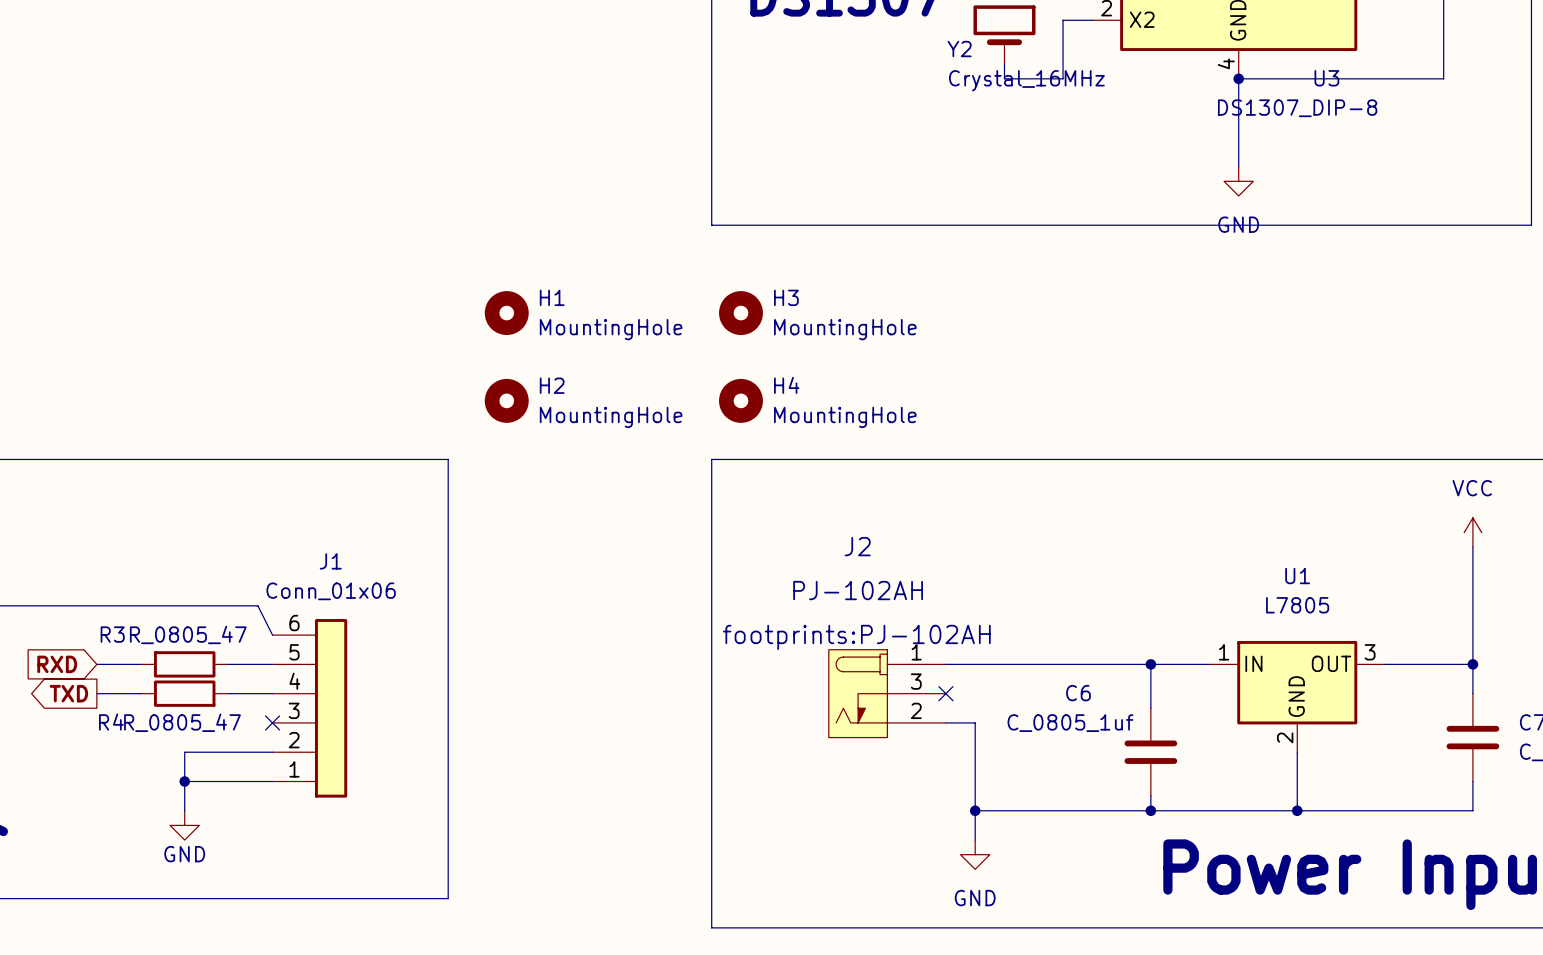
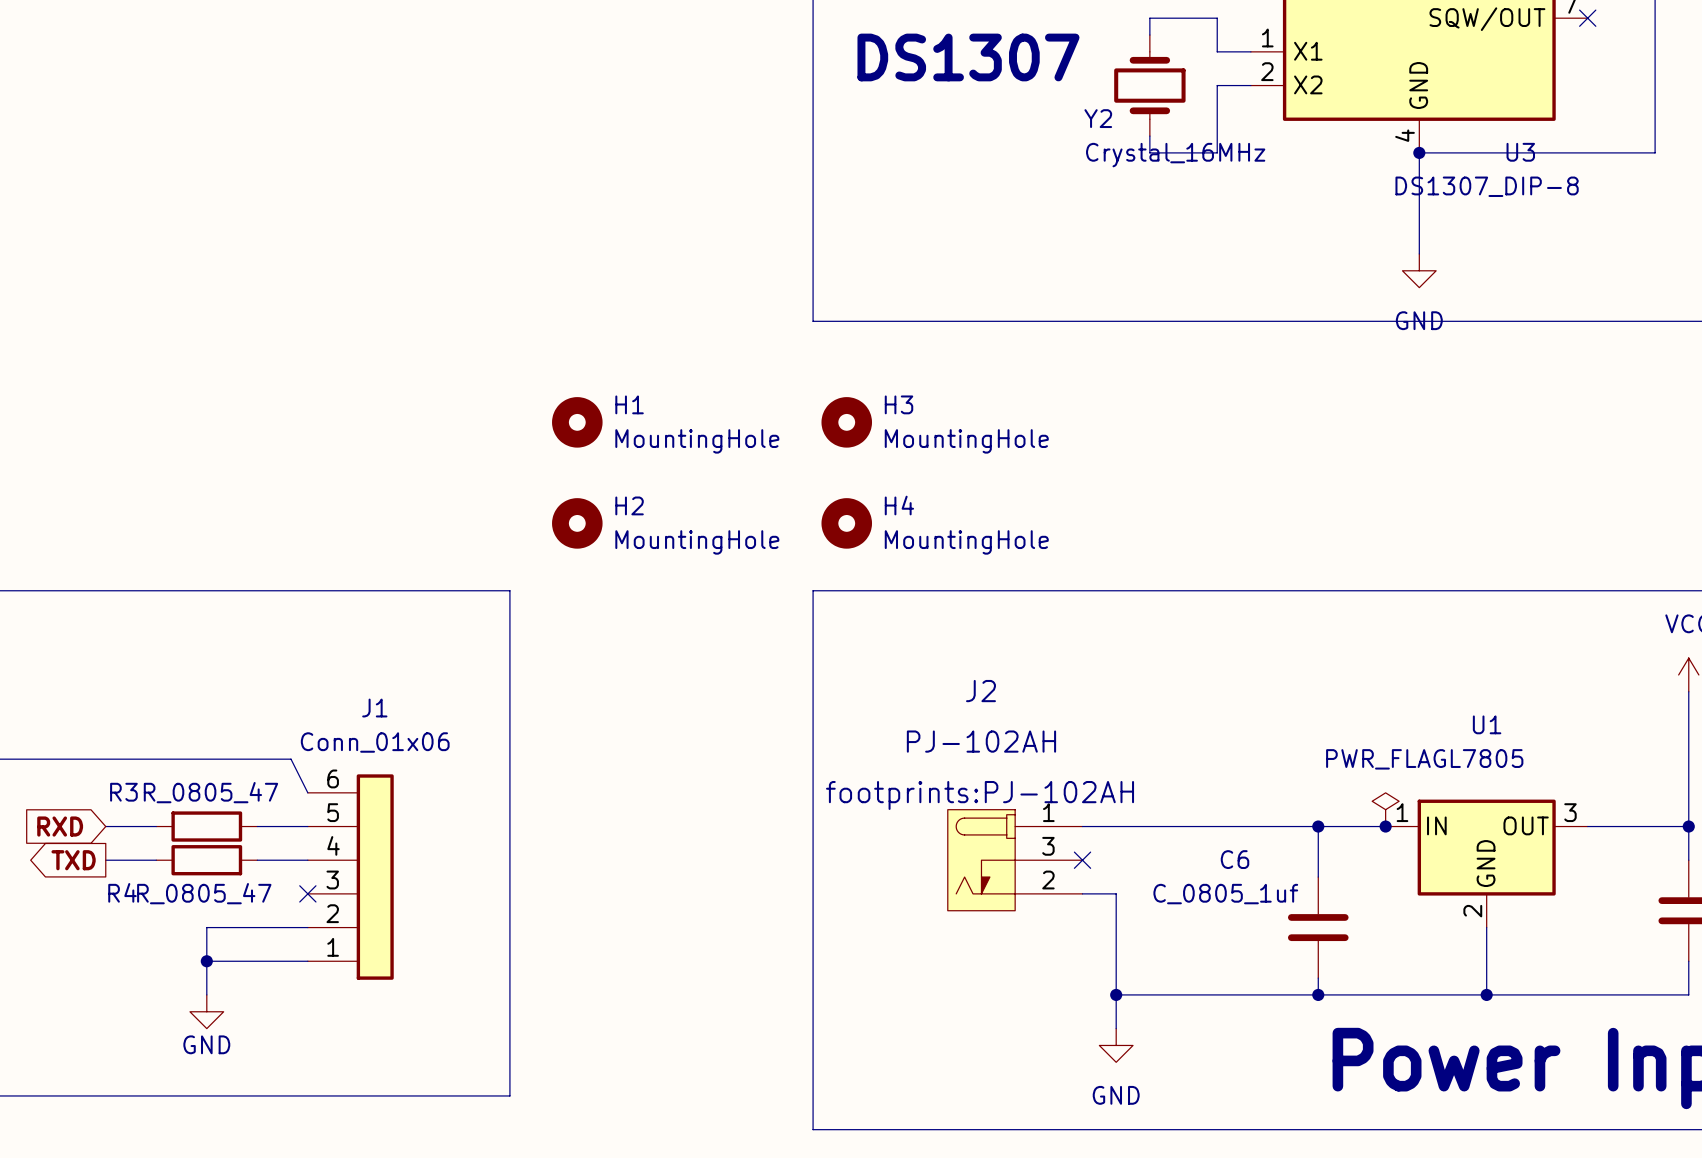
power symbol: none -> PWR_FLAG (1385, 809)
junction: none -> (1385, 826)

